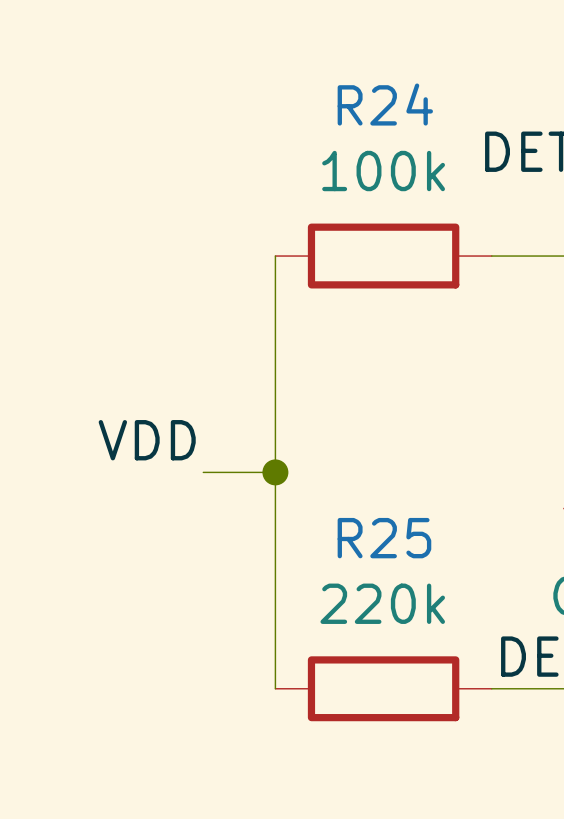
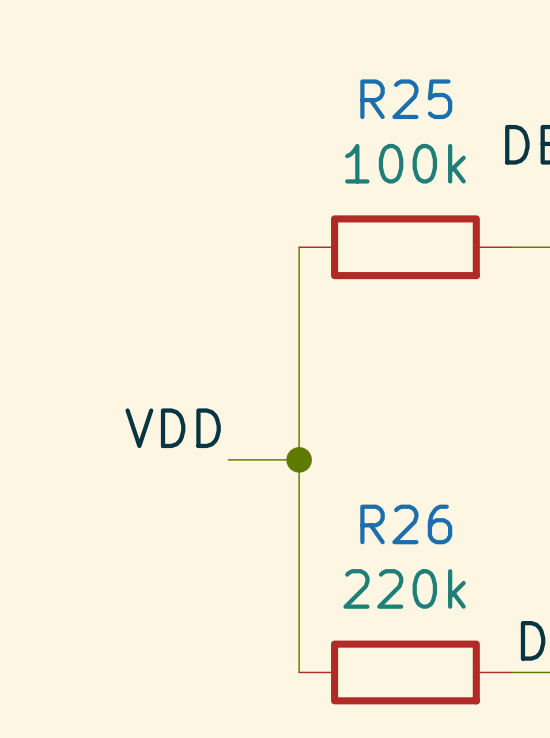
R24 name: R24 (385, 104) -> R25 (406, 99)
R25 name: R25 (384, 538) -> R26 (406, 524)

